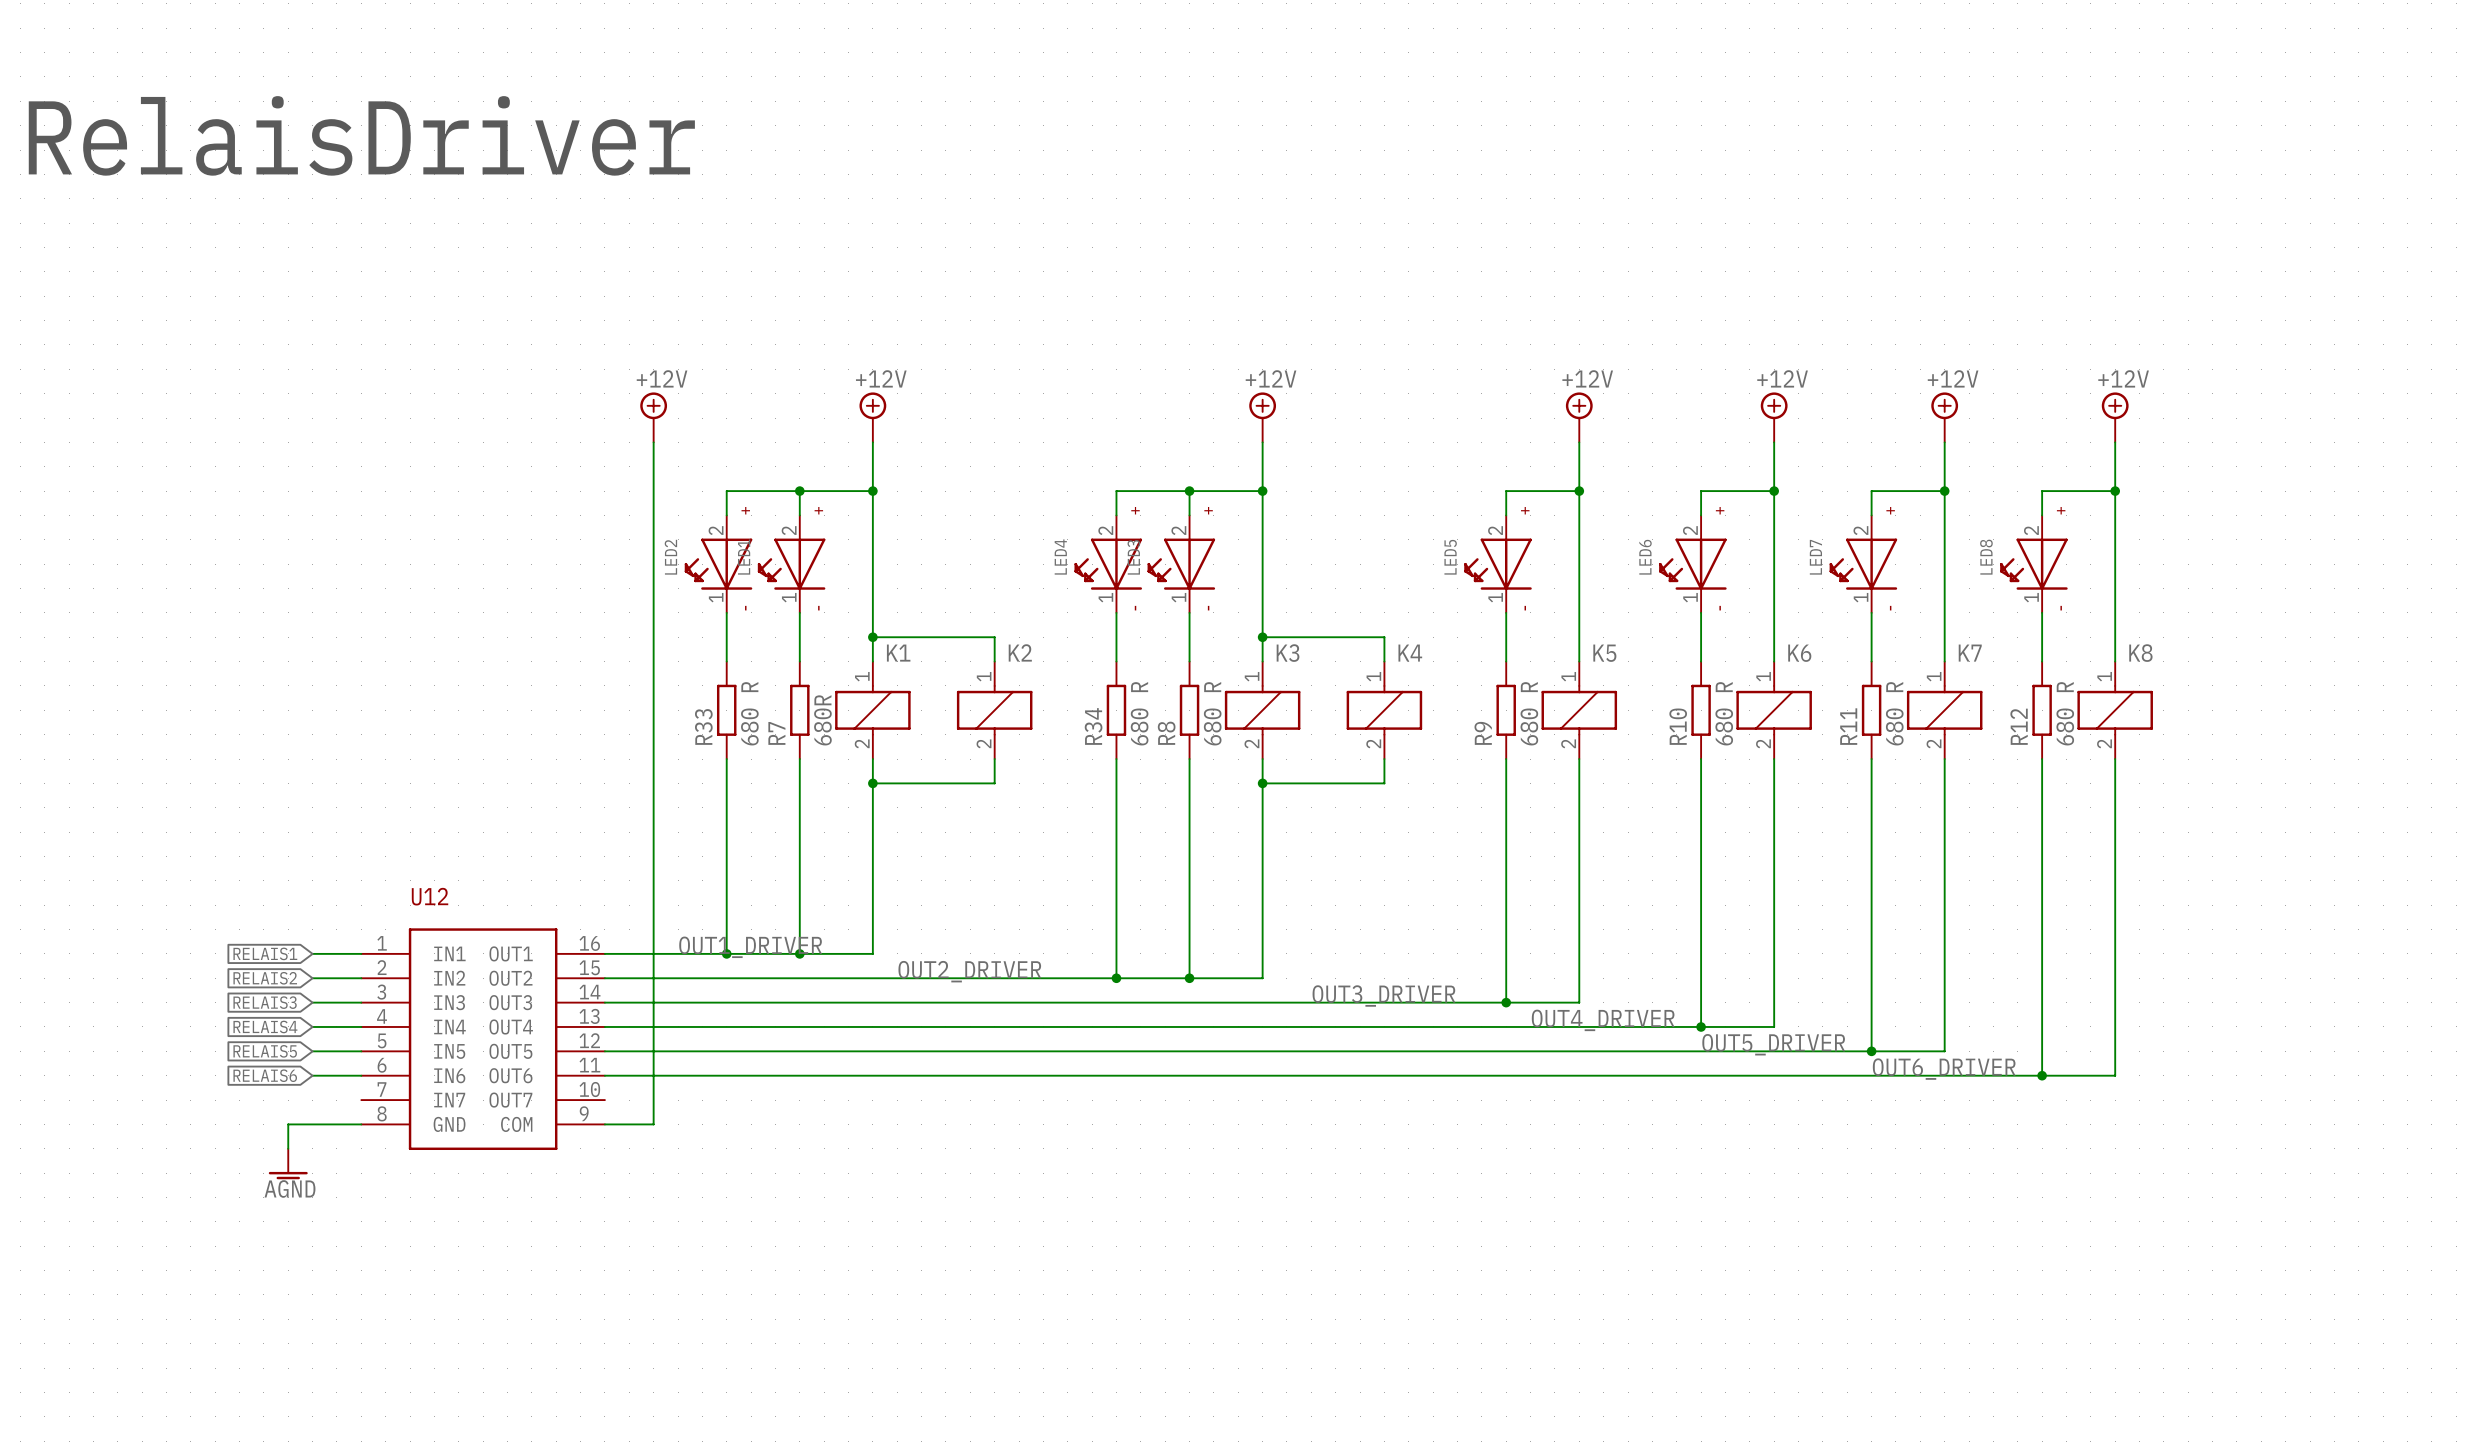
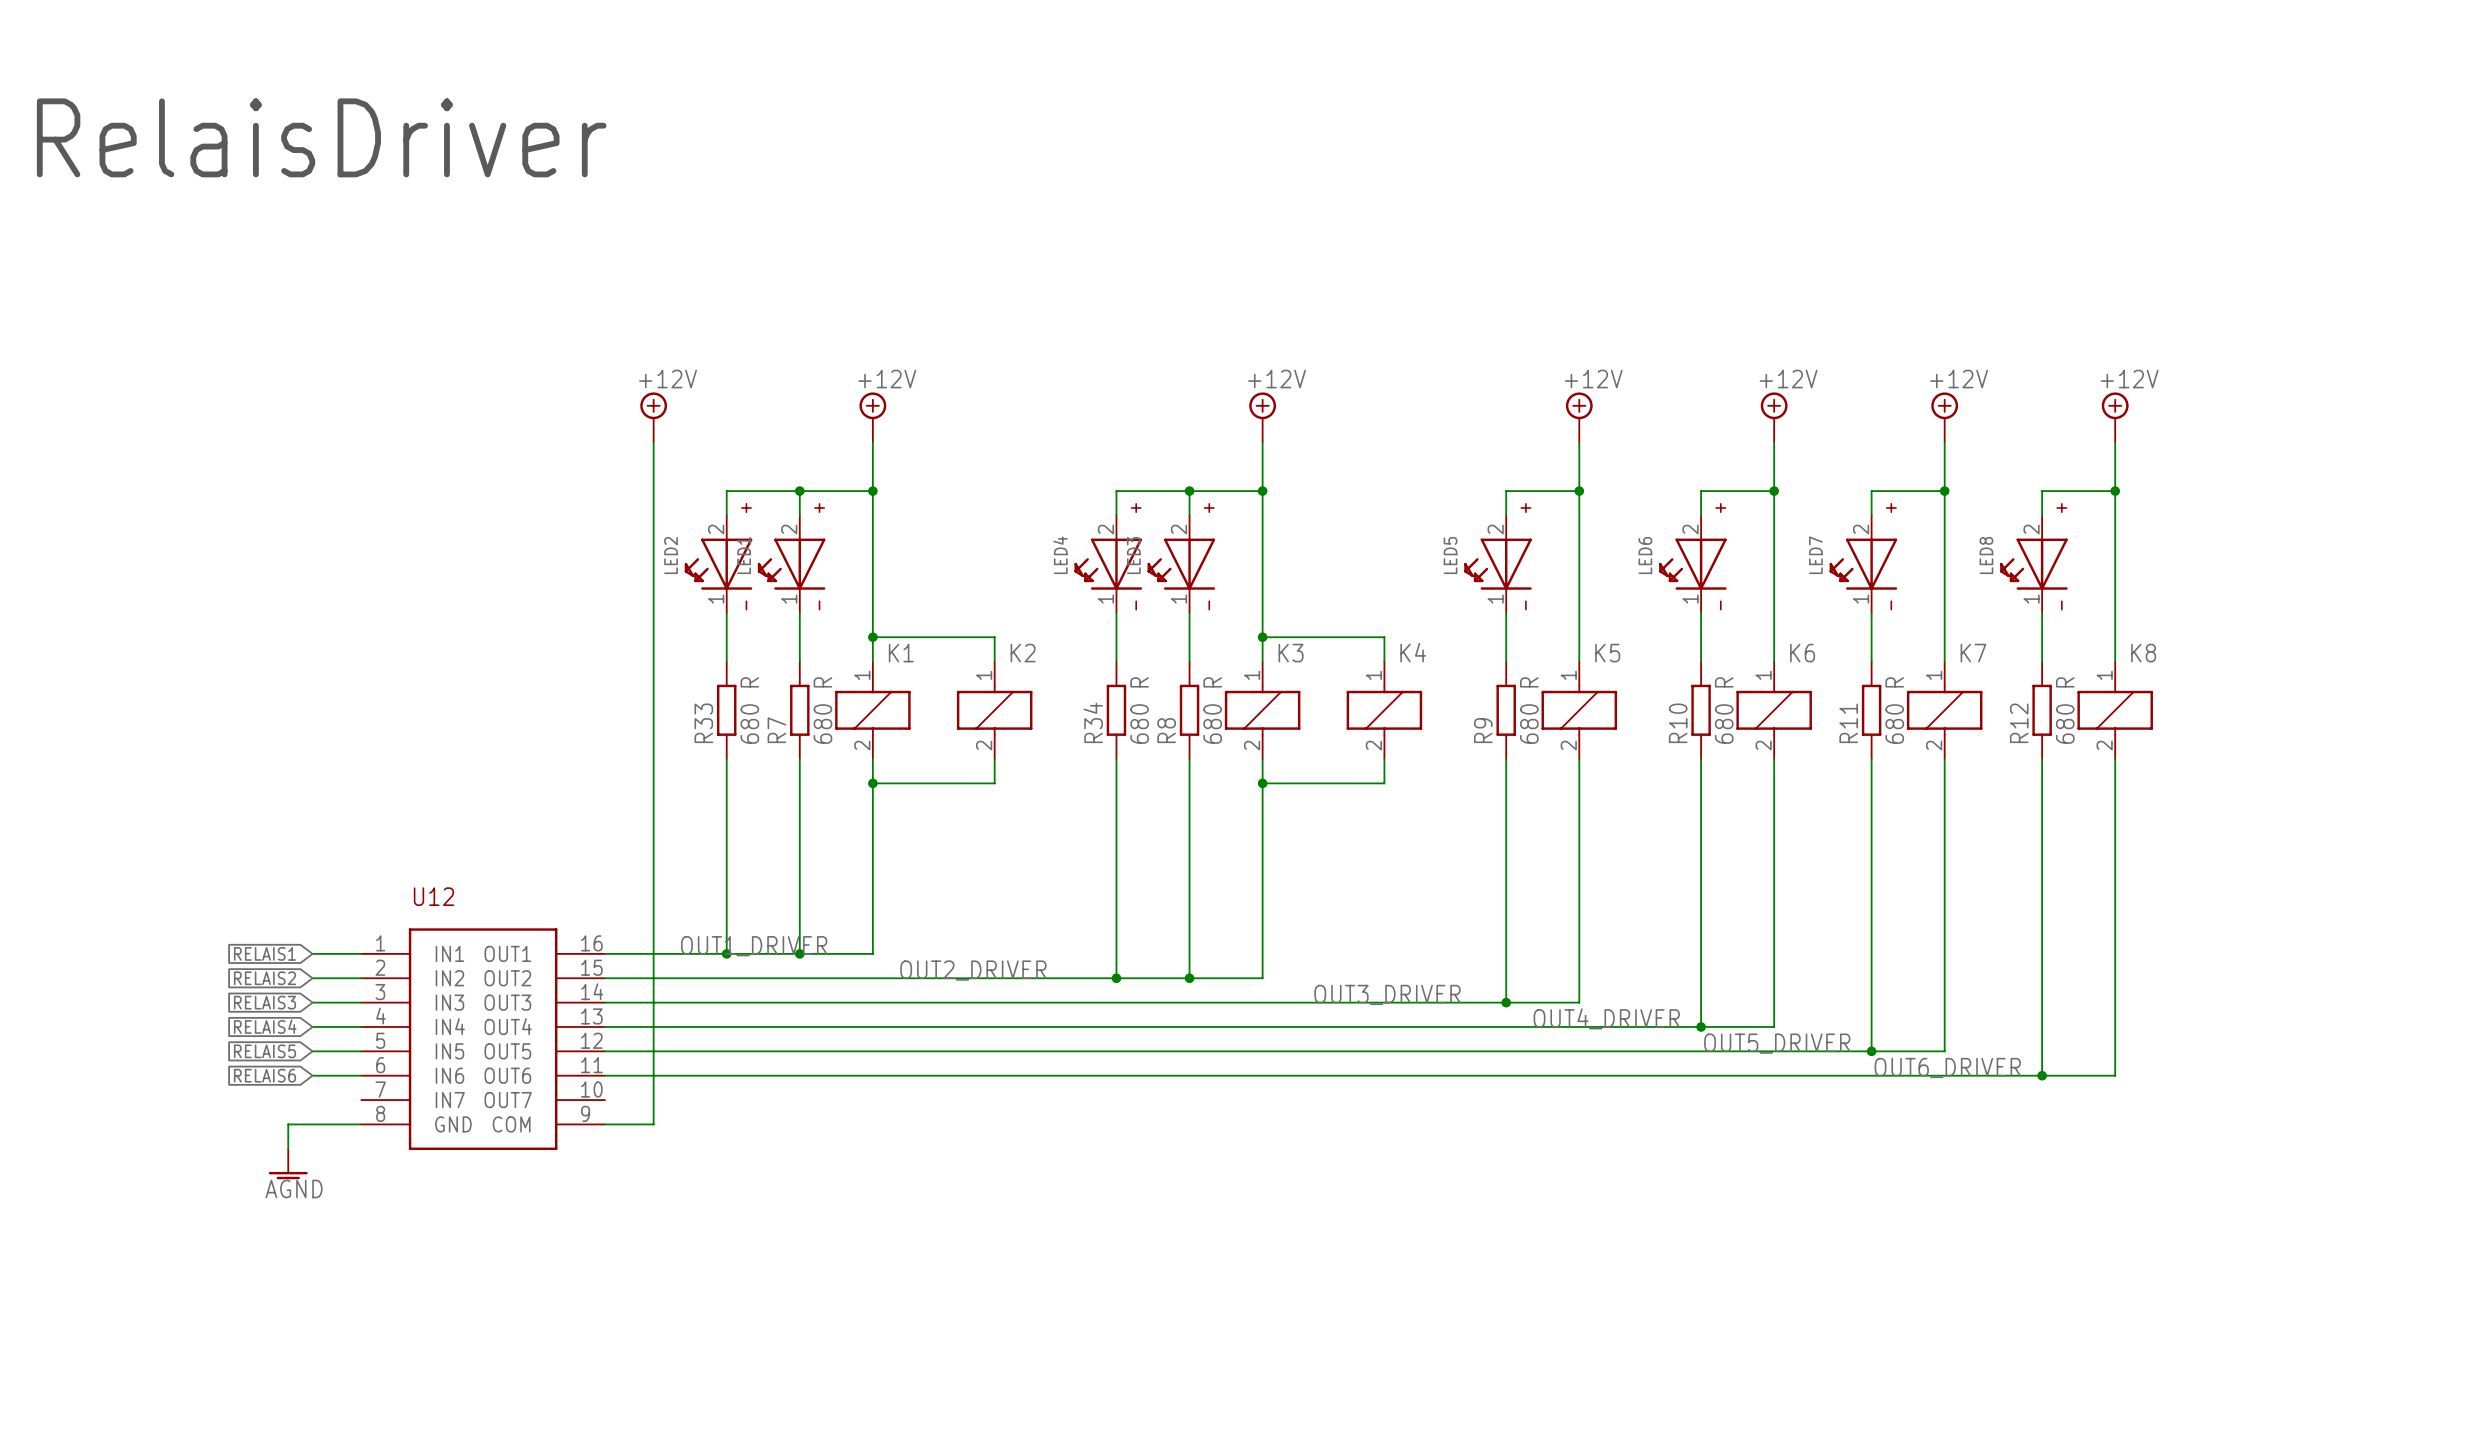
R7 value: 680R (822, 720) -> 680 R (822, 710)

